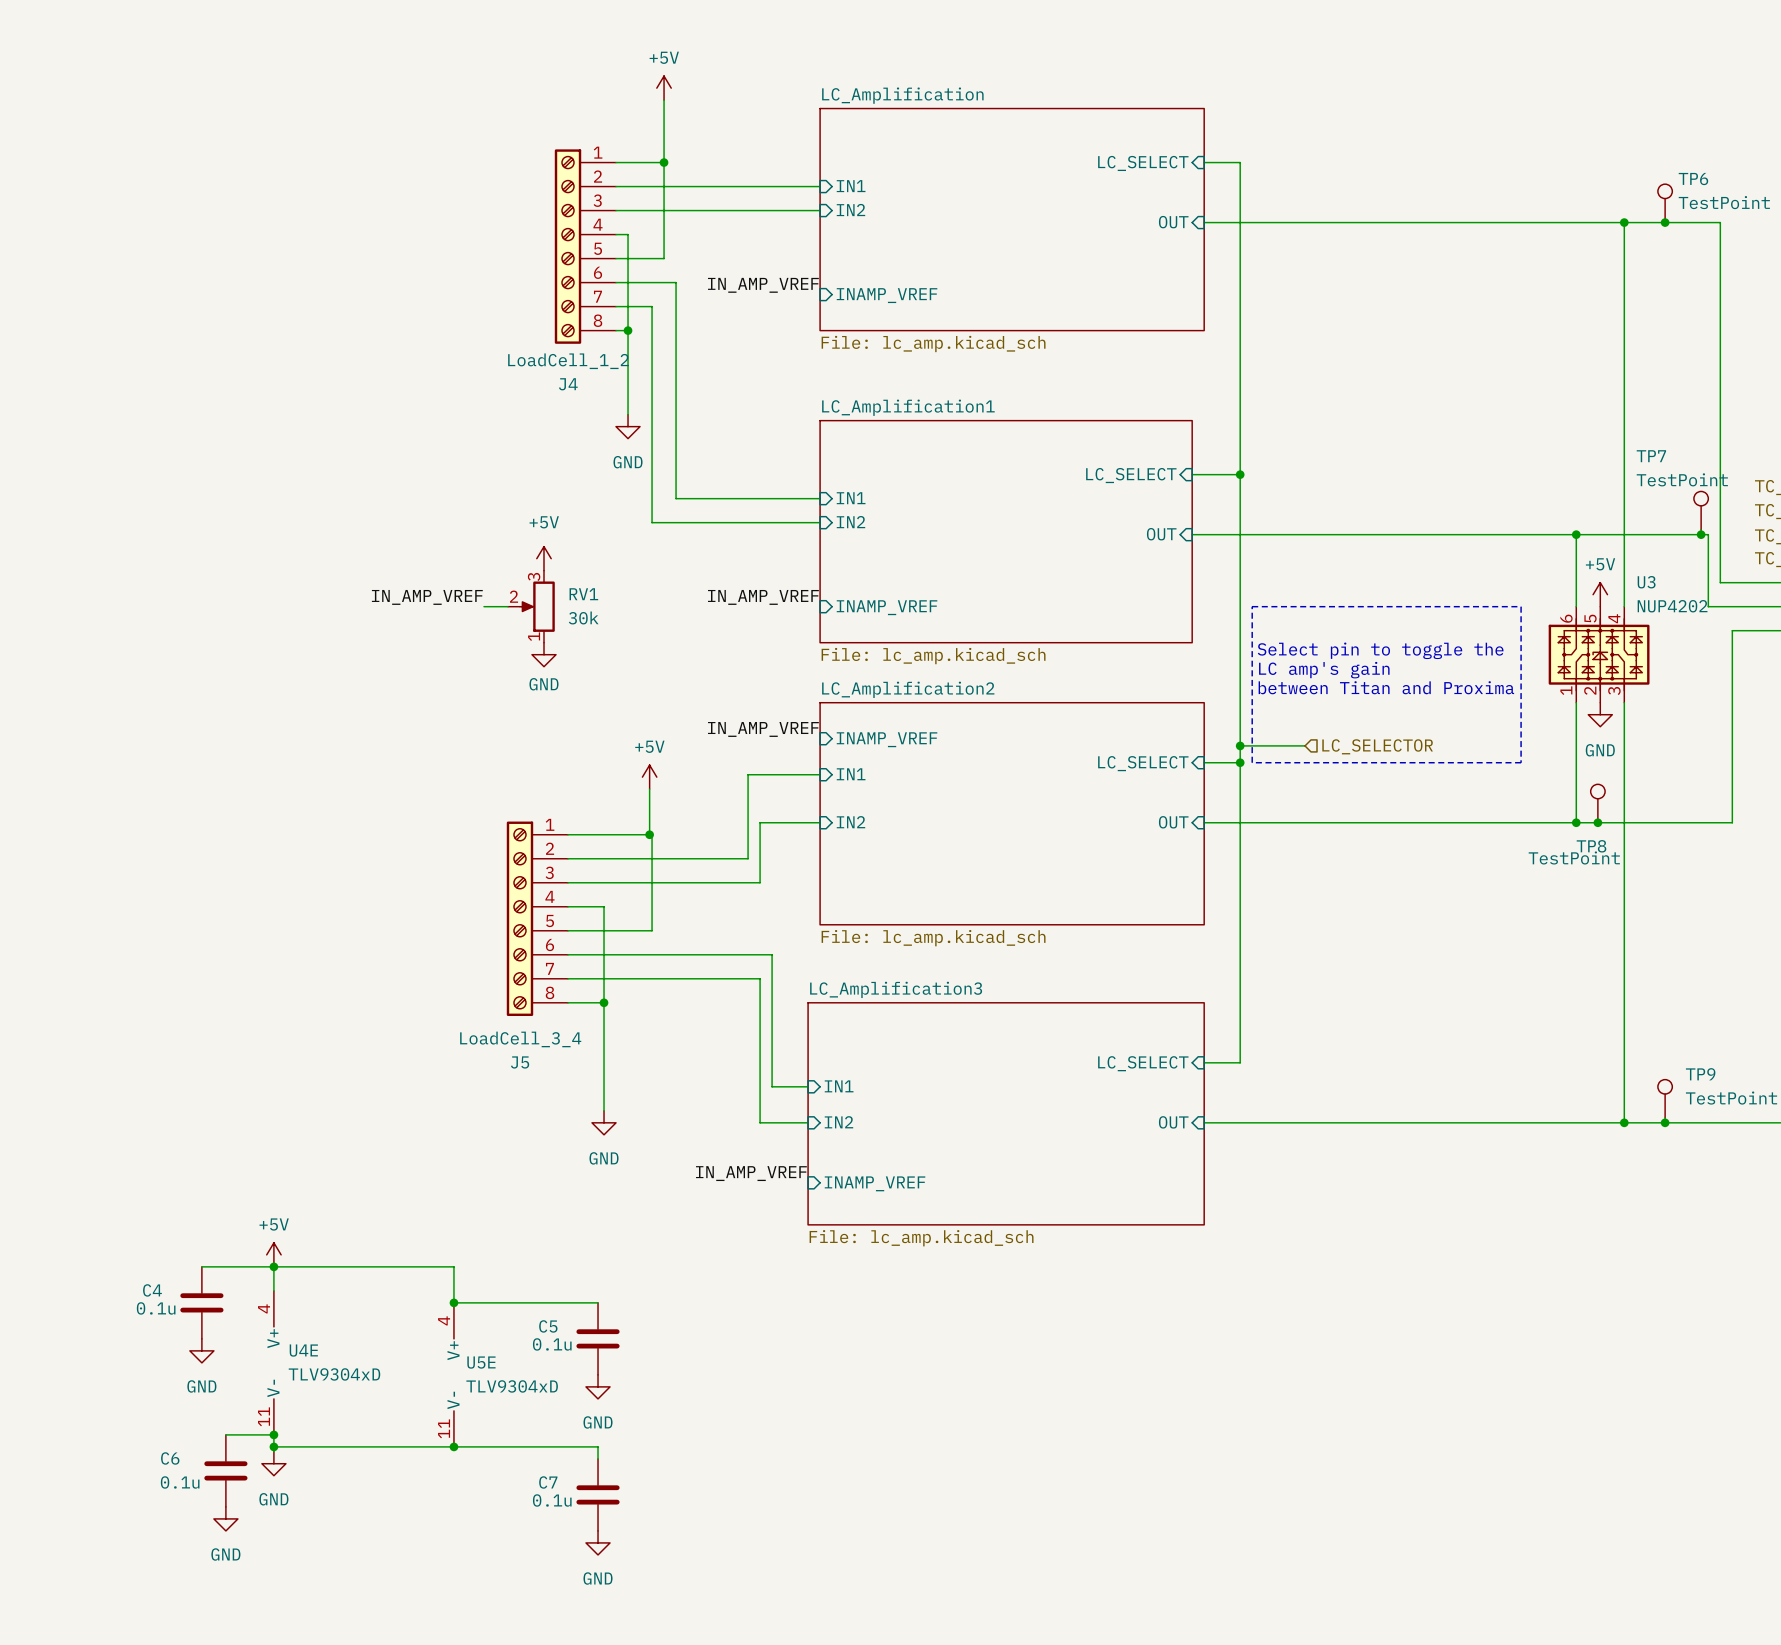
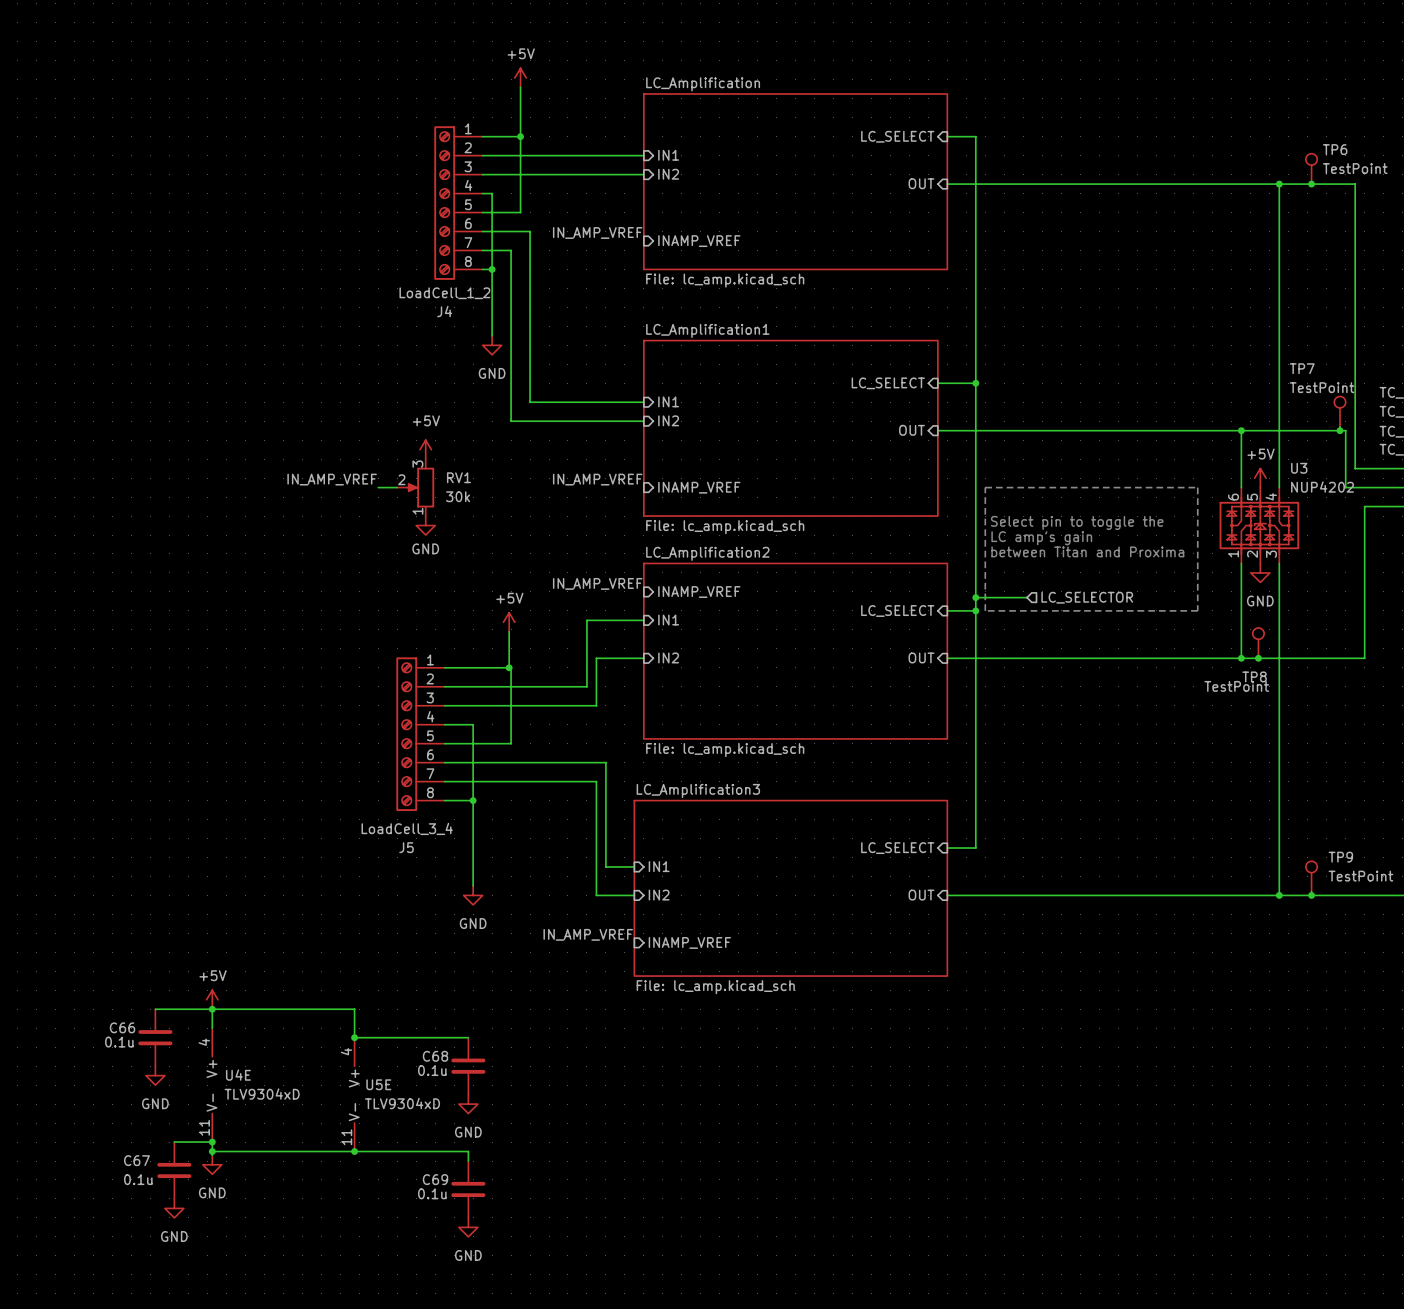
C4 name: C4 (152, 1290) -> C66 (122, 1027)
C5 name: C5 (548, 1326) -> C68 (435, 1056)
C6 name: C6 (170, 1458) -> C67 (136, 1160)
C7 name: C7 (548, 1482) -> C69 (435, 1179)

